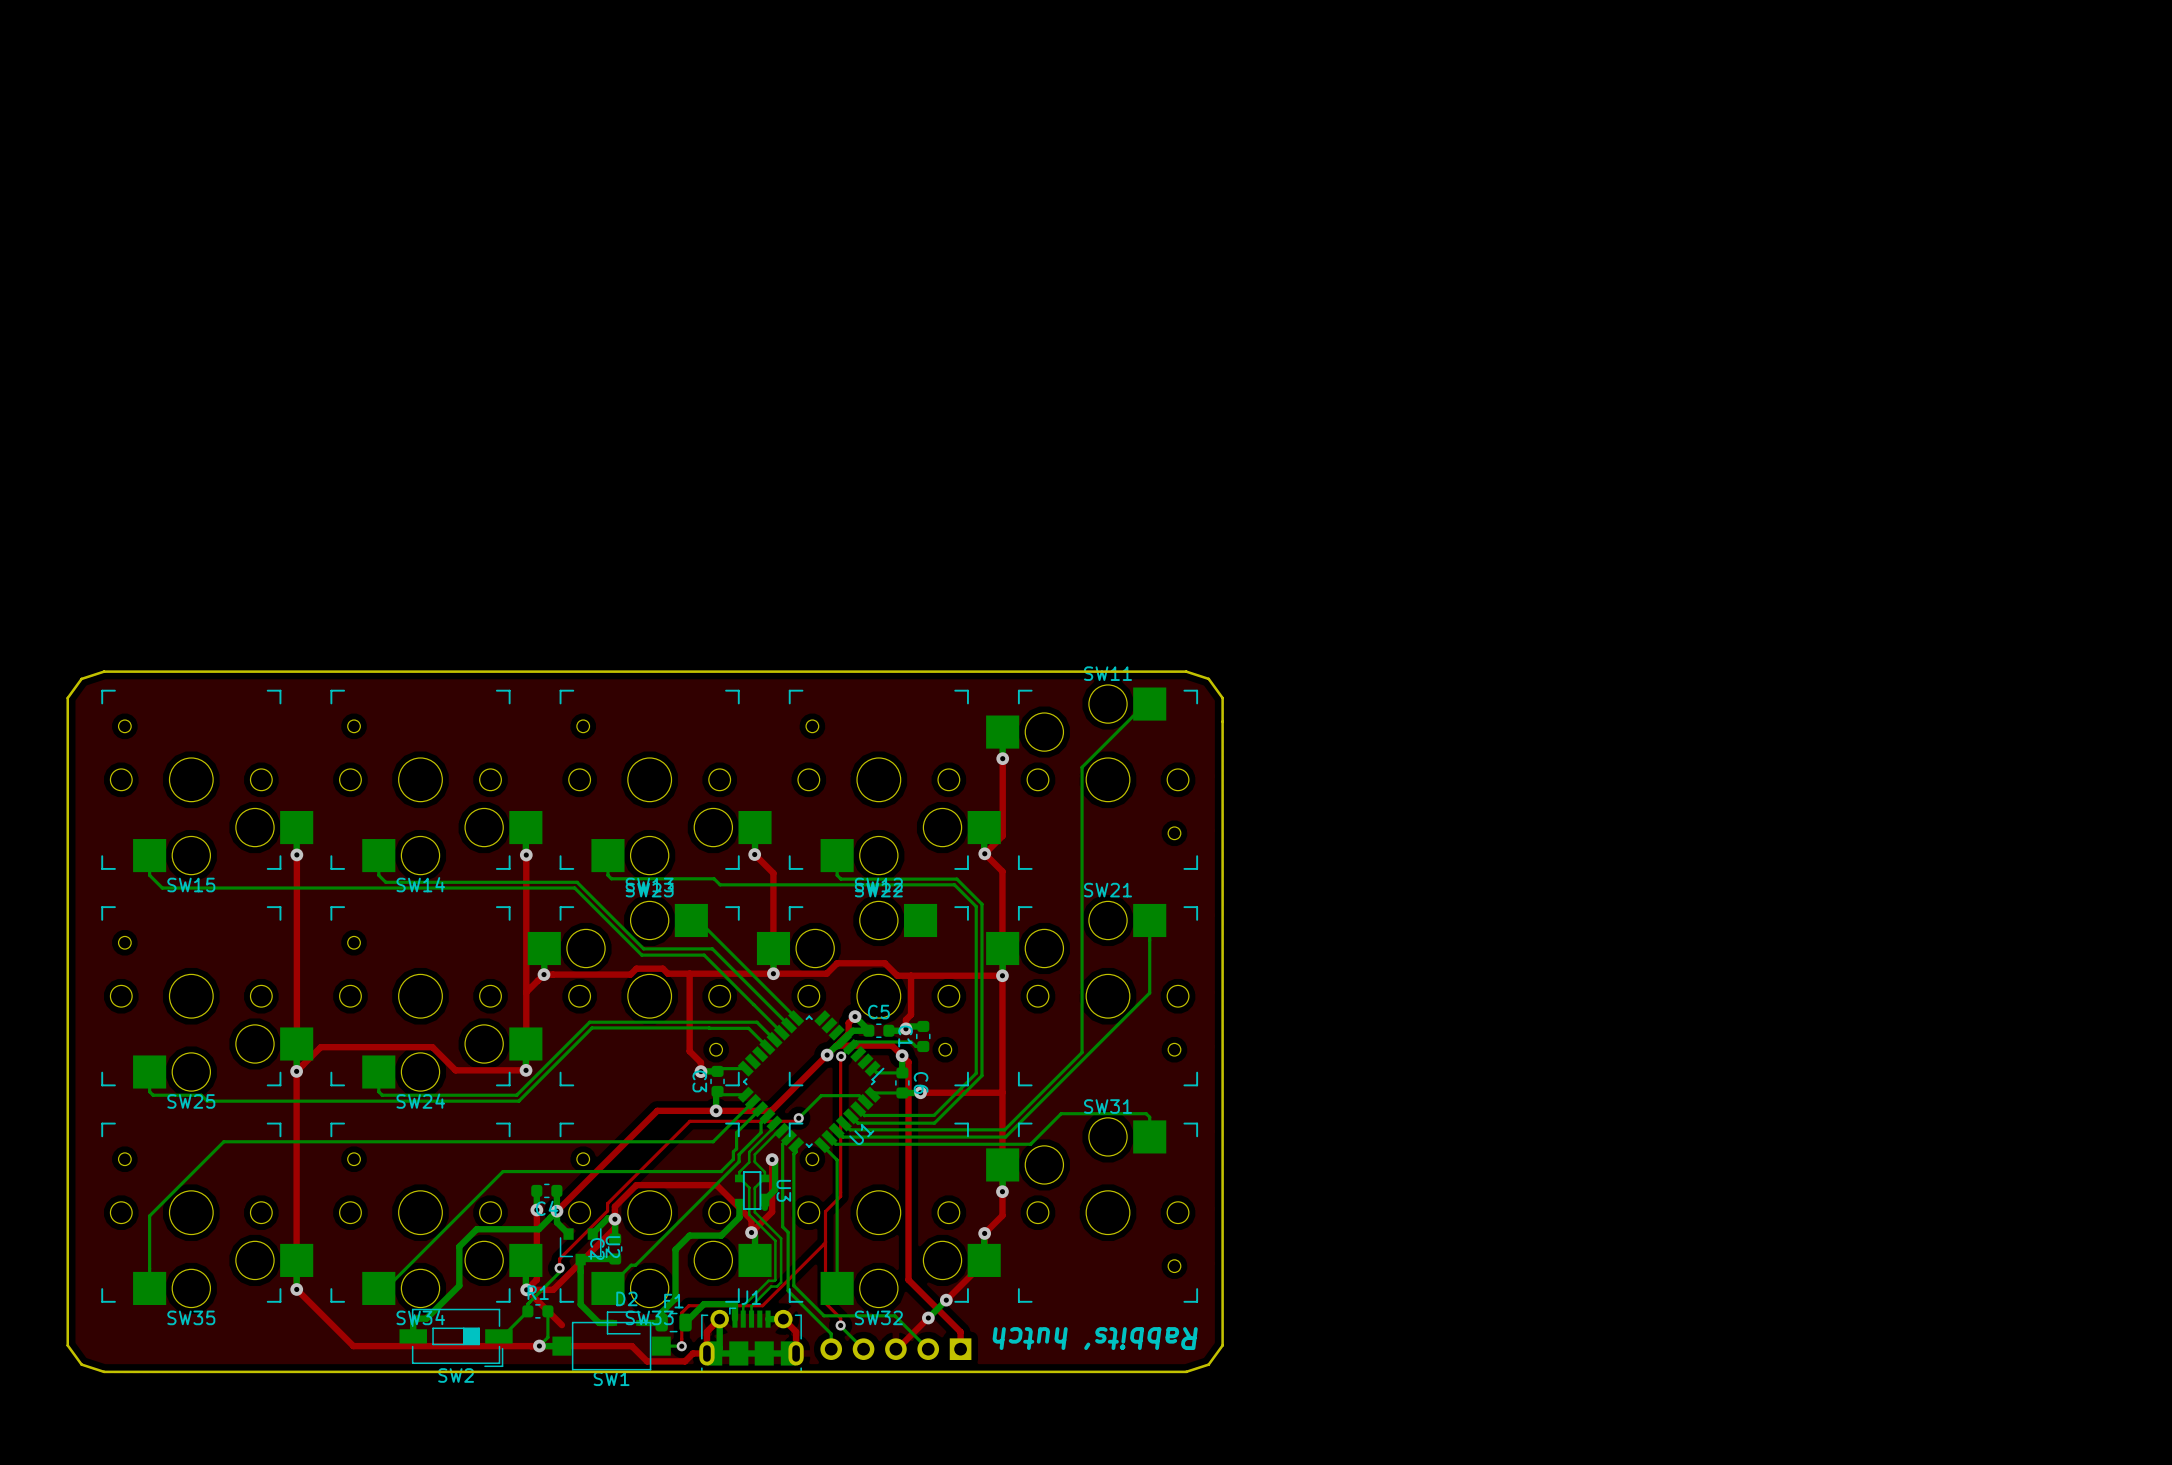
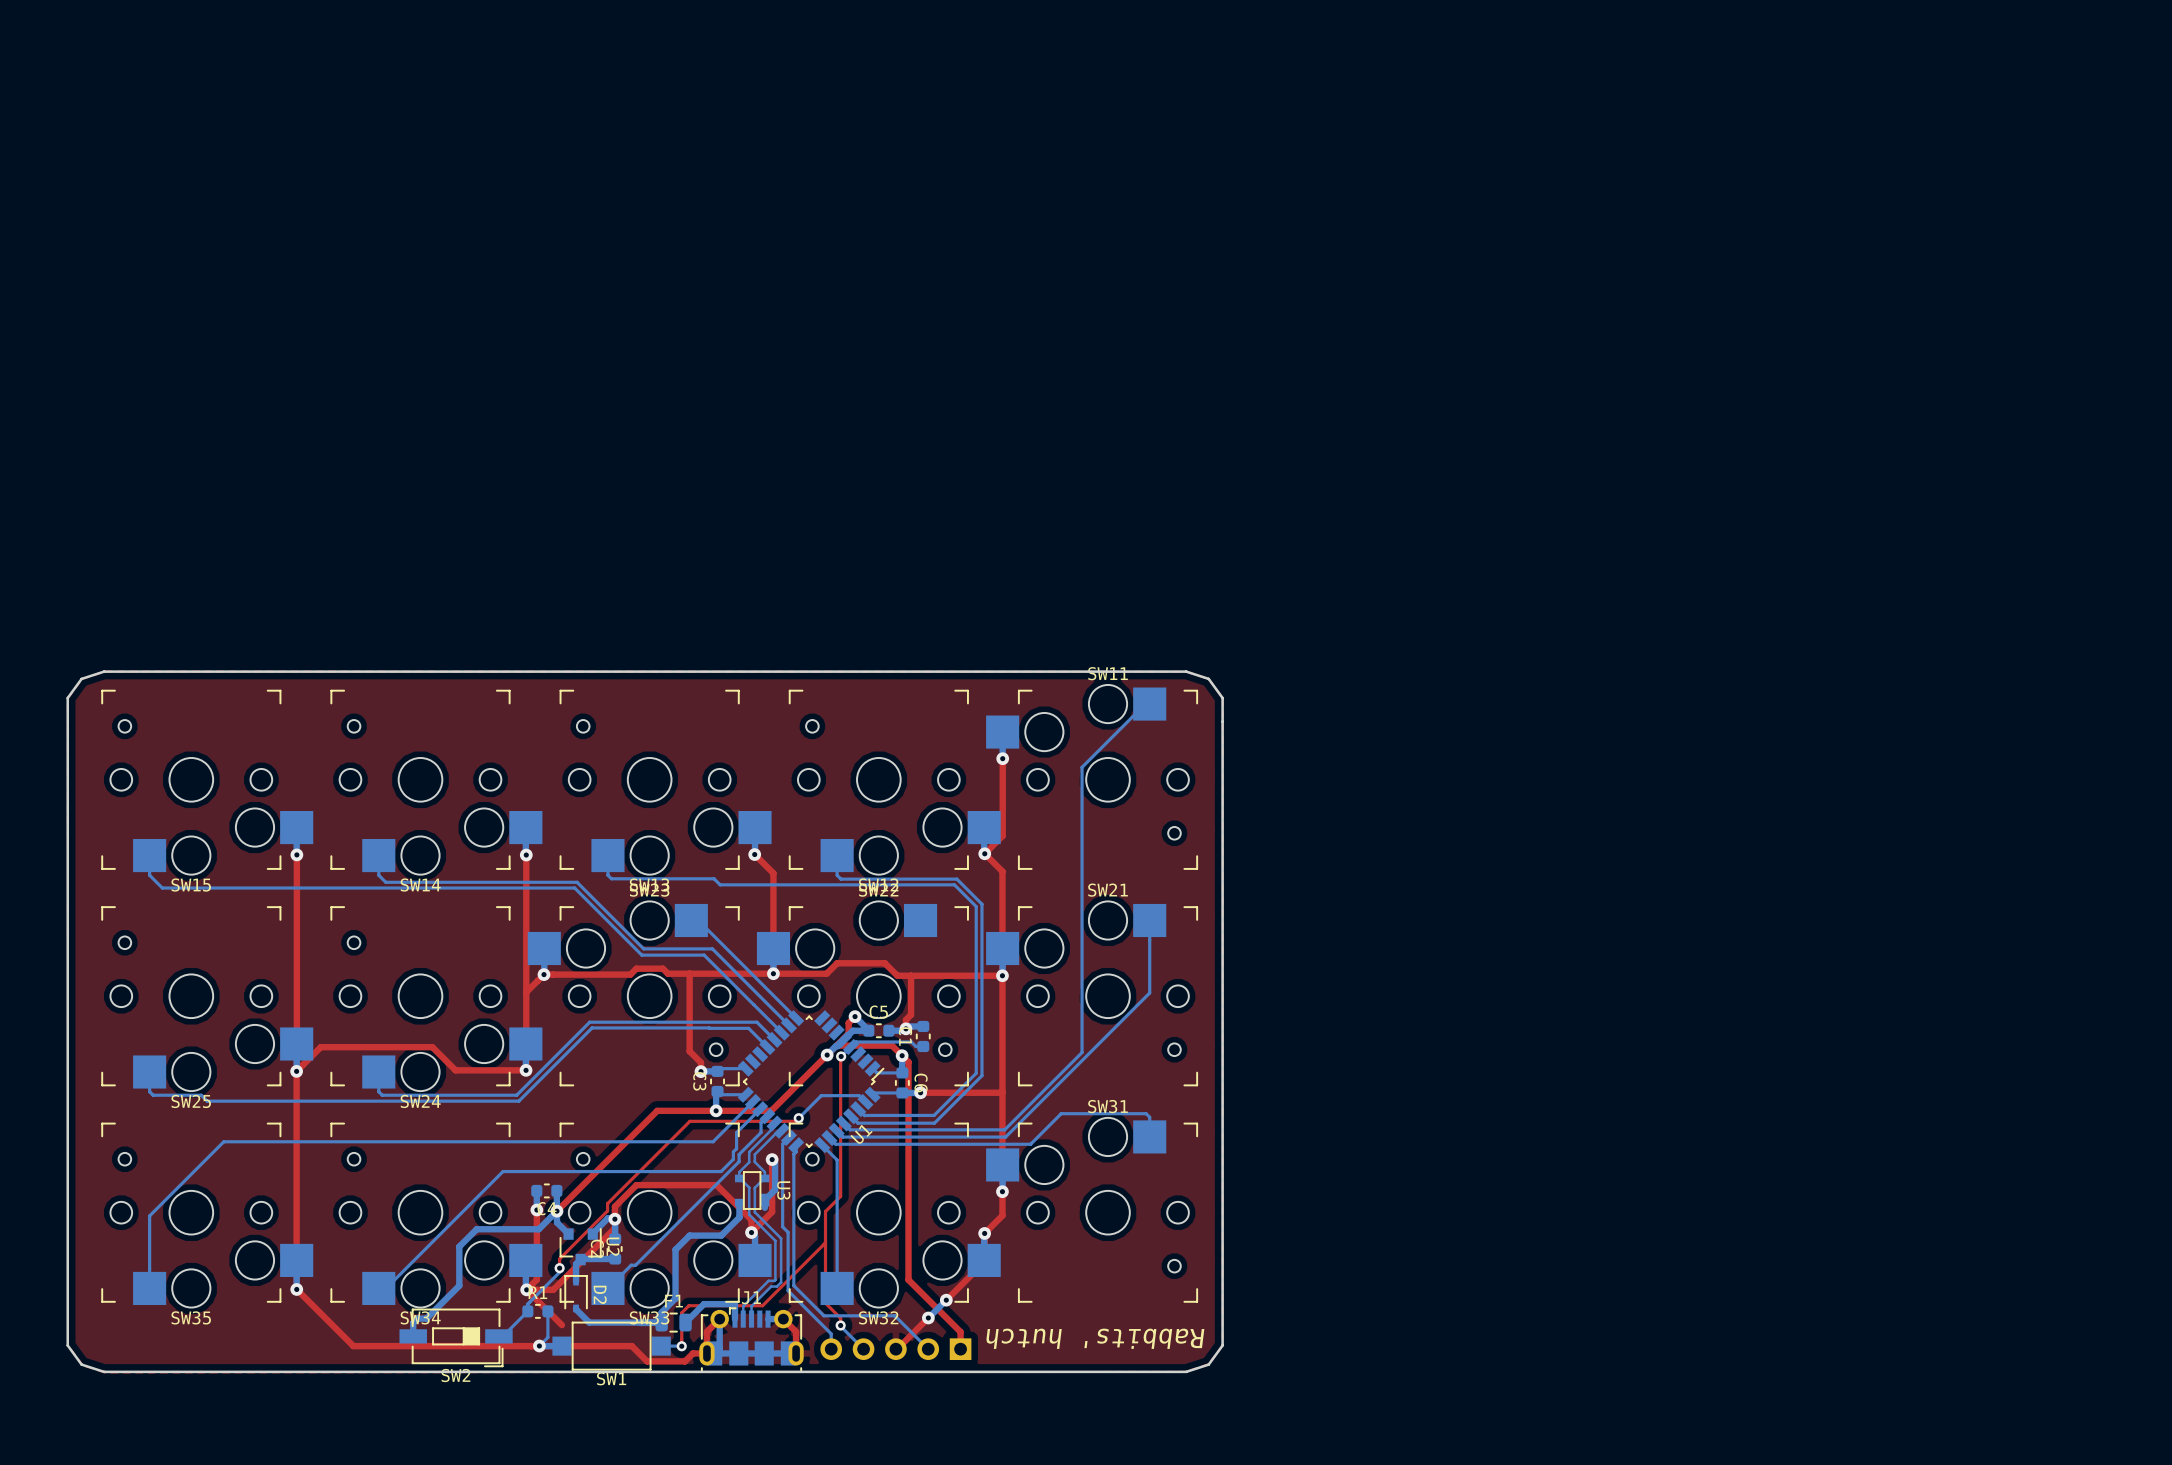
bottom track: (580, 1259) (580, 1304) (599, 1322) (613, 1322) -> (580, 1259) (576, 1264) (576, 1281)
bottom track: none -> (576, 1308) (589, 1322) (661, 1322)
D2 rotation: 0° (625, 1322) -> 90° clockwise (576, 1293)
D2 position: (625, 1322) -> (576, 1293)

